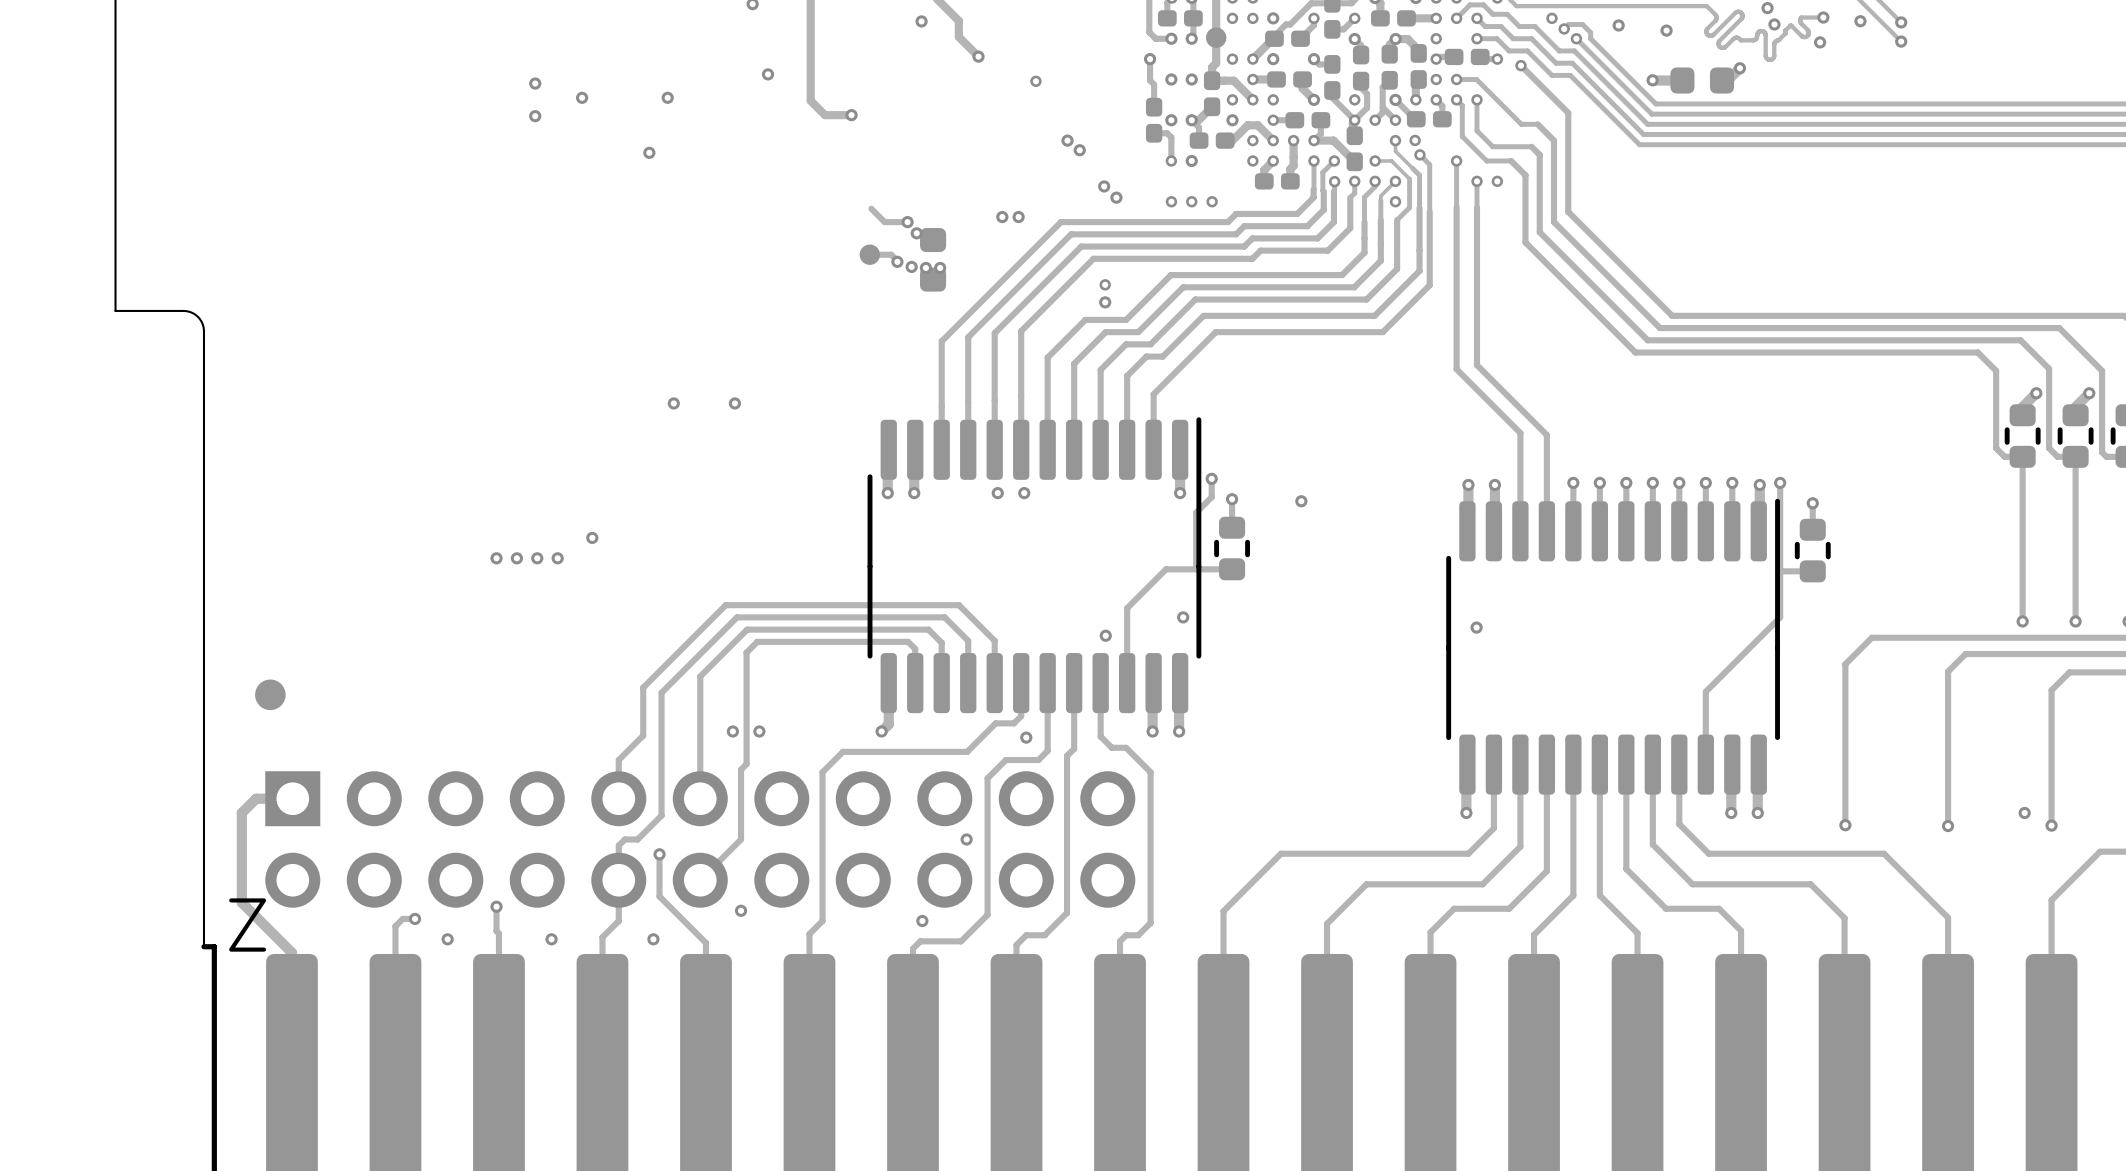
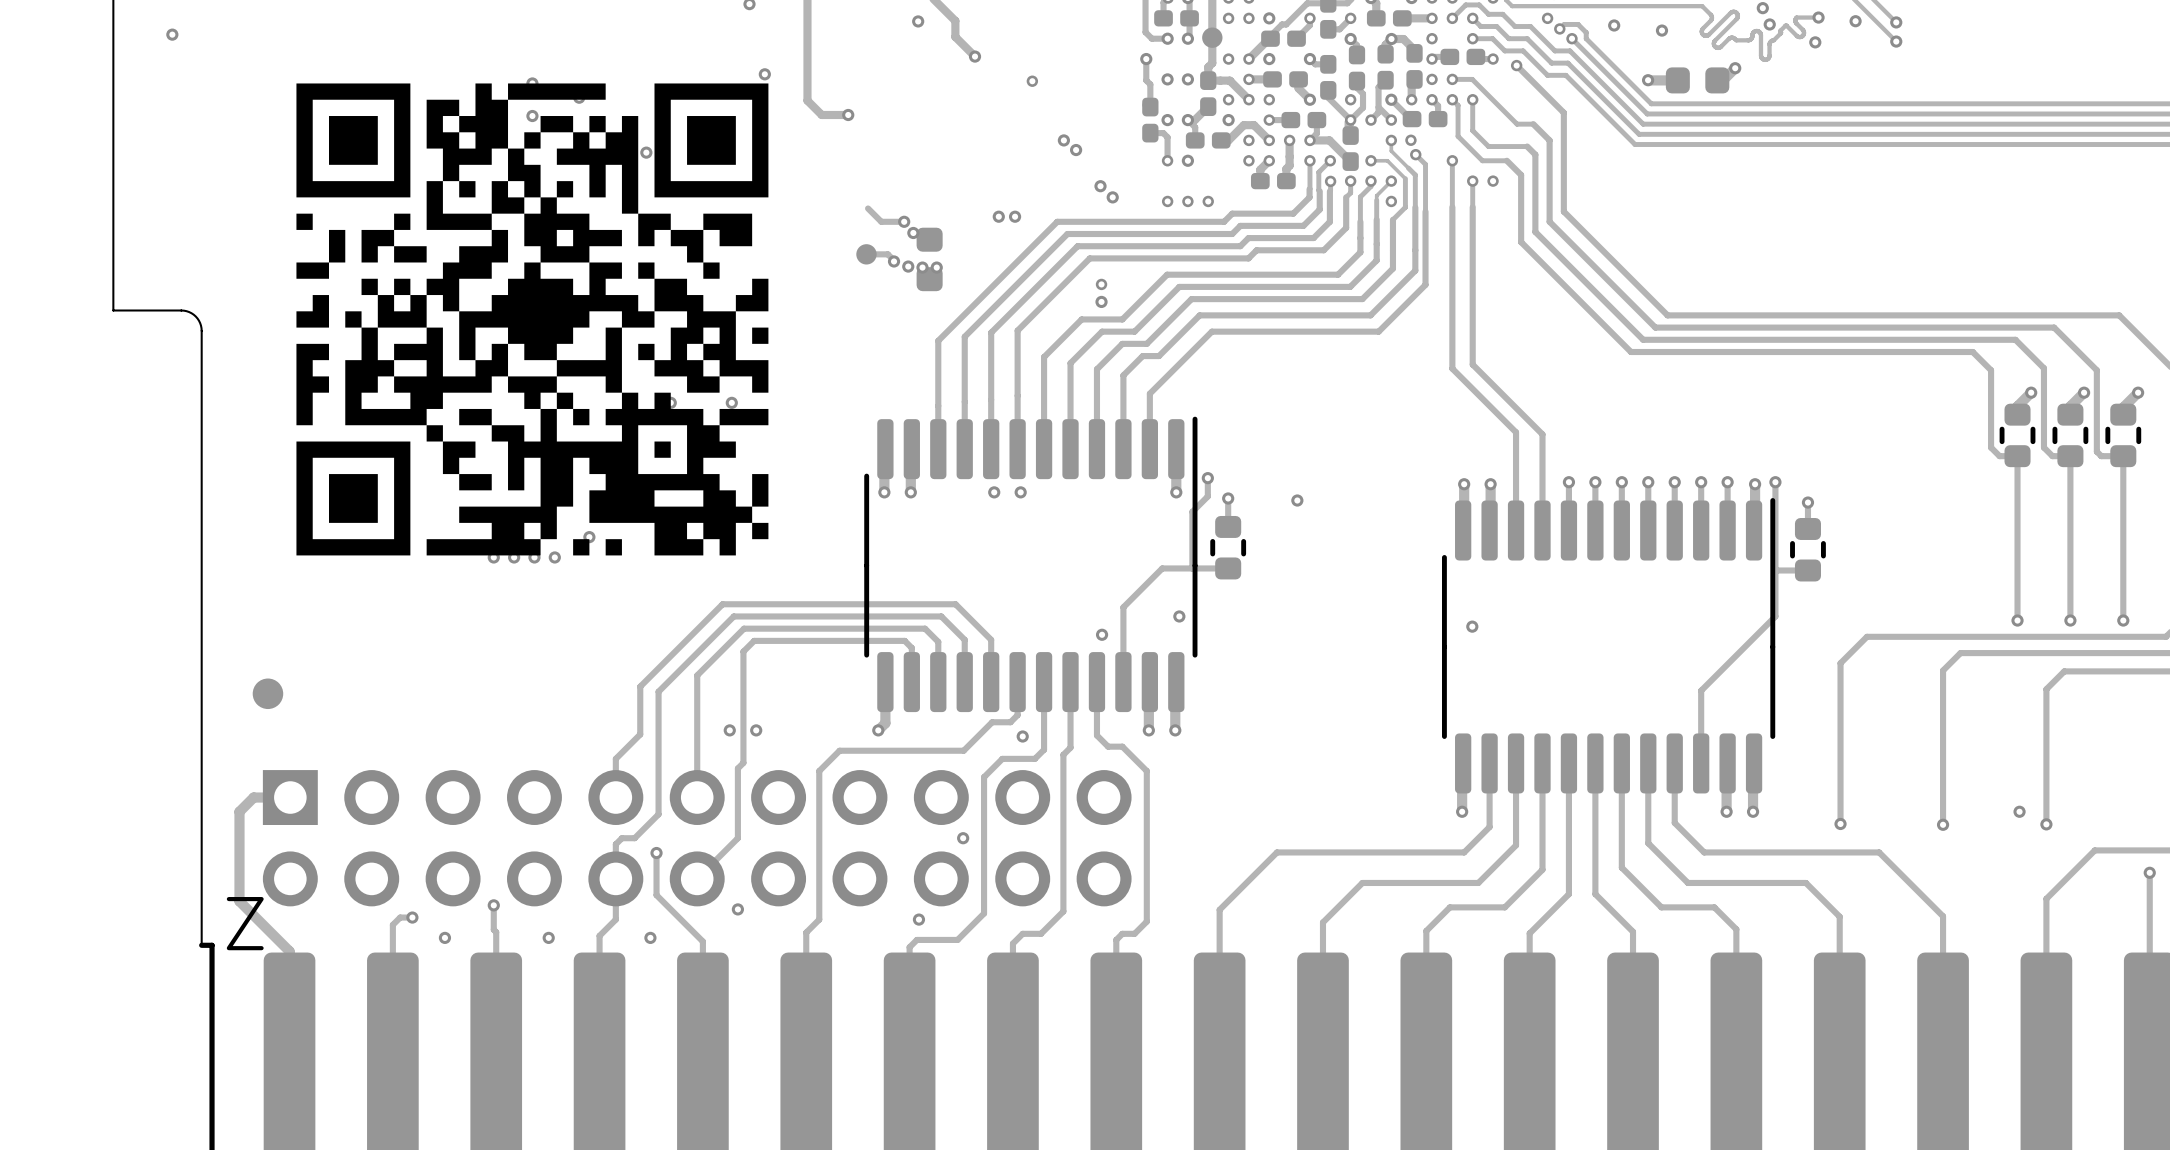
via: none -> (172, 34)
drawing: none -> [296, 83, 769, 556]

